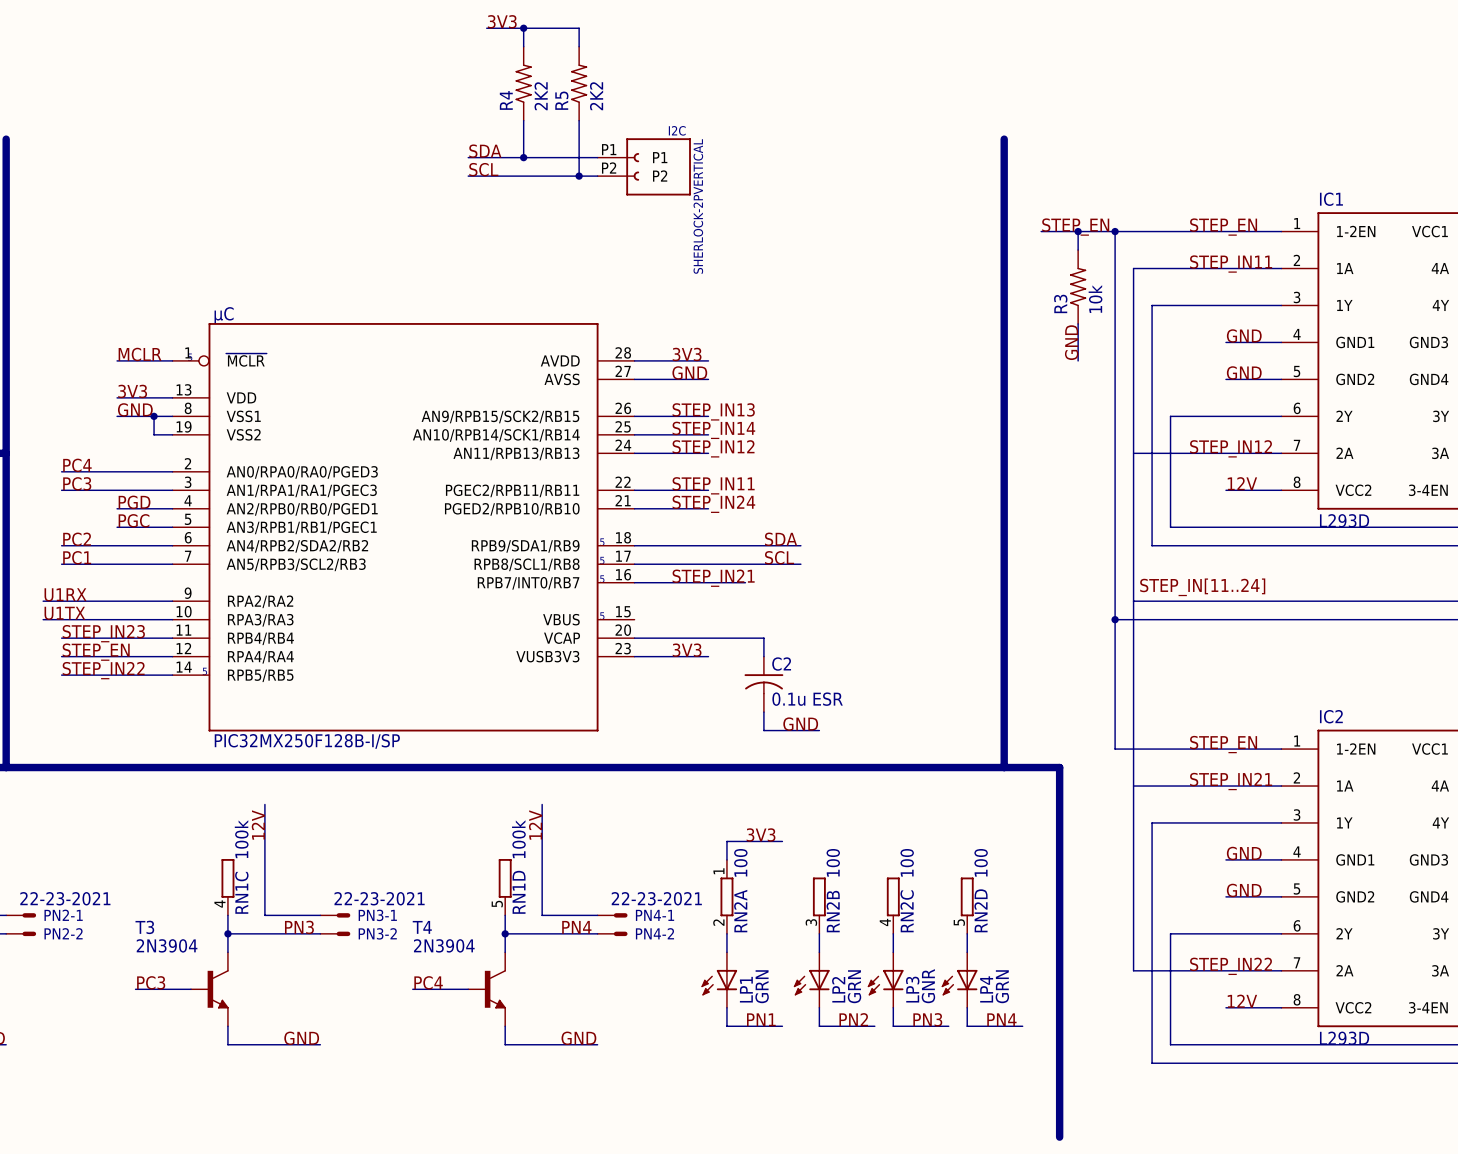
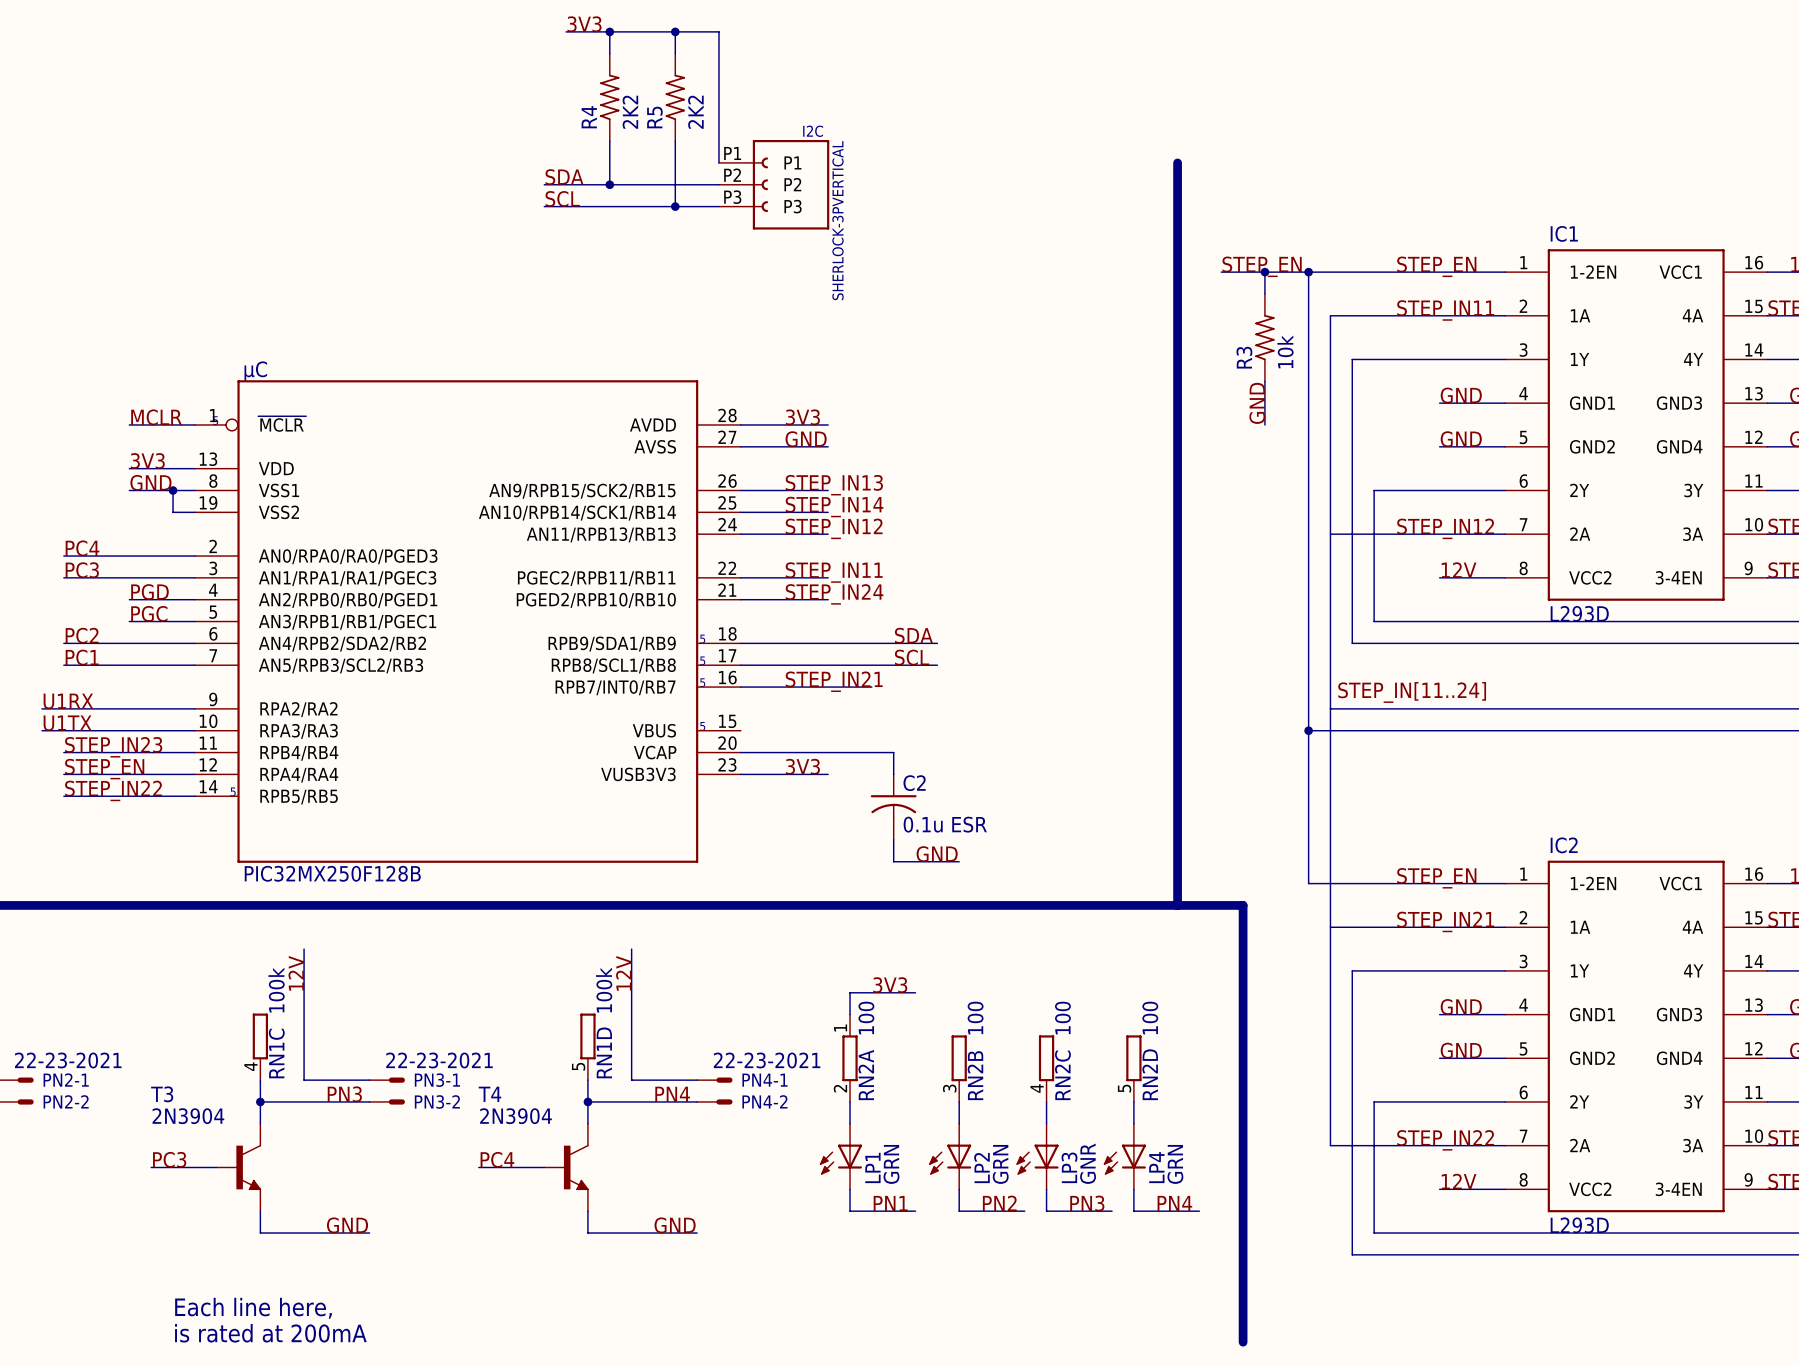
wire: none -> (675, 31) (718, 31) (718, 162)
junction: none -> (675, 31)
I2C symbol: [597, 138, 691, 196] -> [718, 140, 830, 230]
I2C value: SHERLOCK-2PVERTICAL (698, 206) -> SHERLOCK-3PVERTICAL (838, 220)
µC value: PIC32MX250F128B-I/SP (307, 741) -> PIC32MX250F128B (332, 873)
text: none -> Each line here, (253, 1308)
text: none -> is rated at 200mA (270, 1333)

